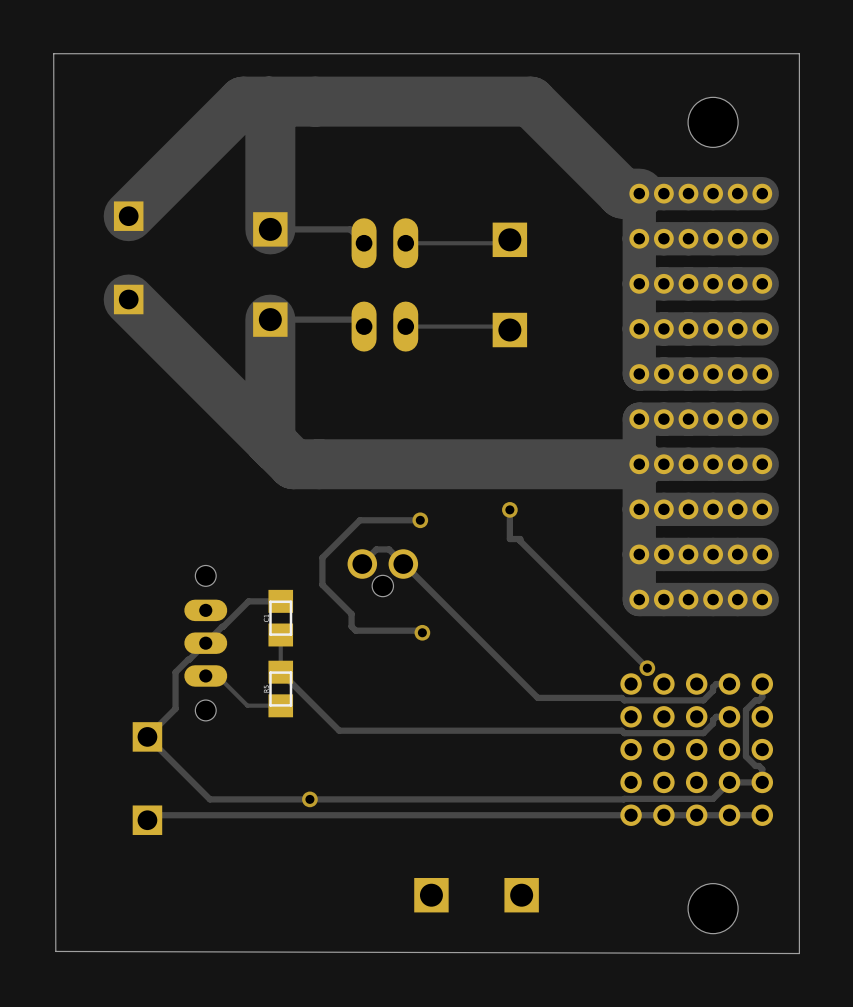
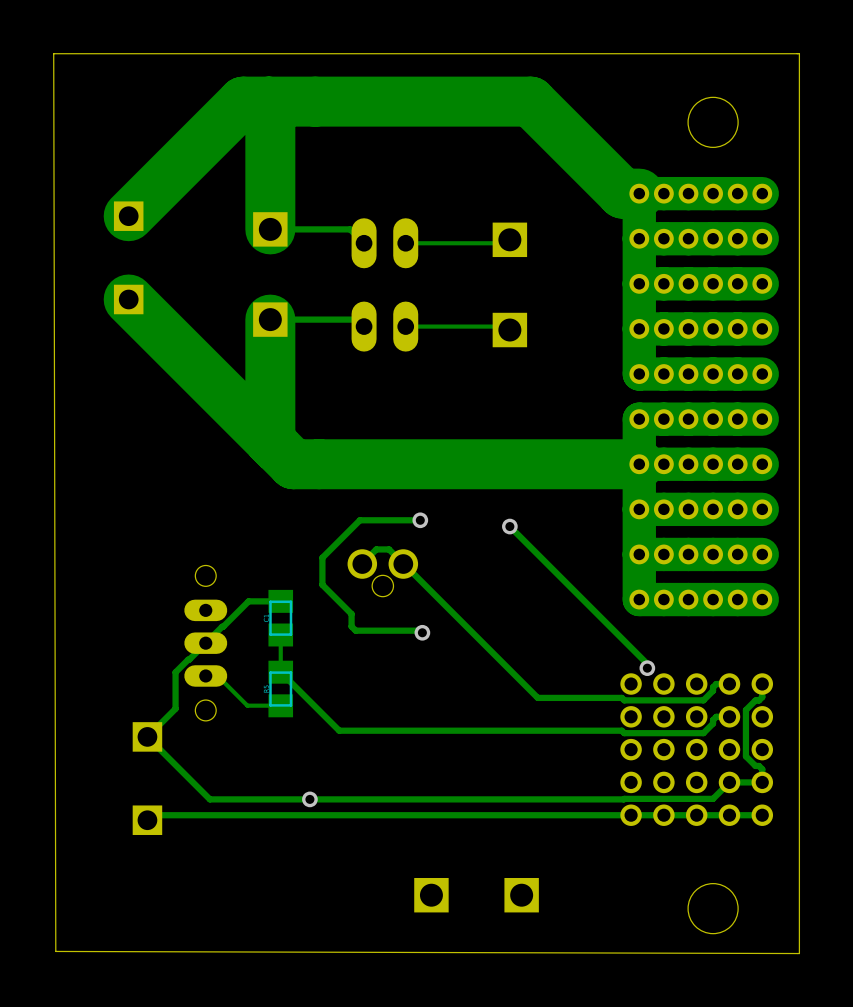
track: (509, 509) (509, 539) (520, 539) (647, 668) -> none
via position: (509, 509) -> (509, 526)
track: none -> (509, 526) (649, 666)

